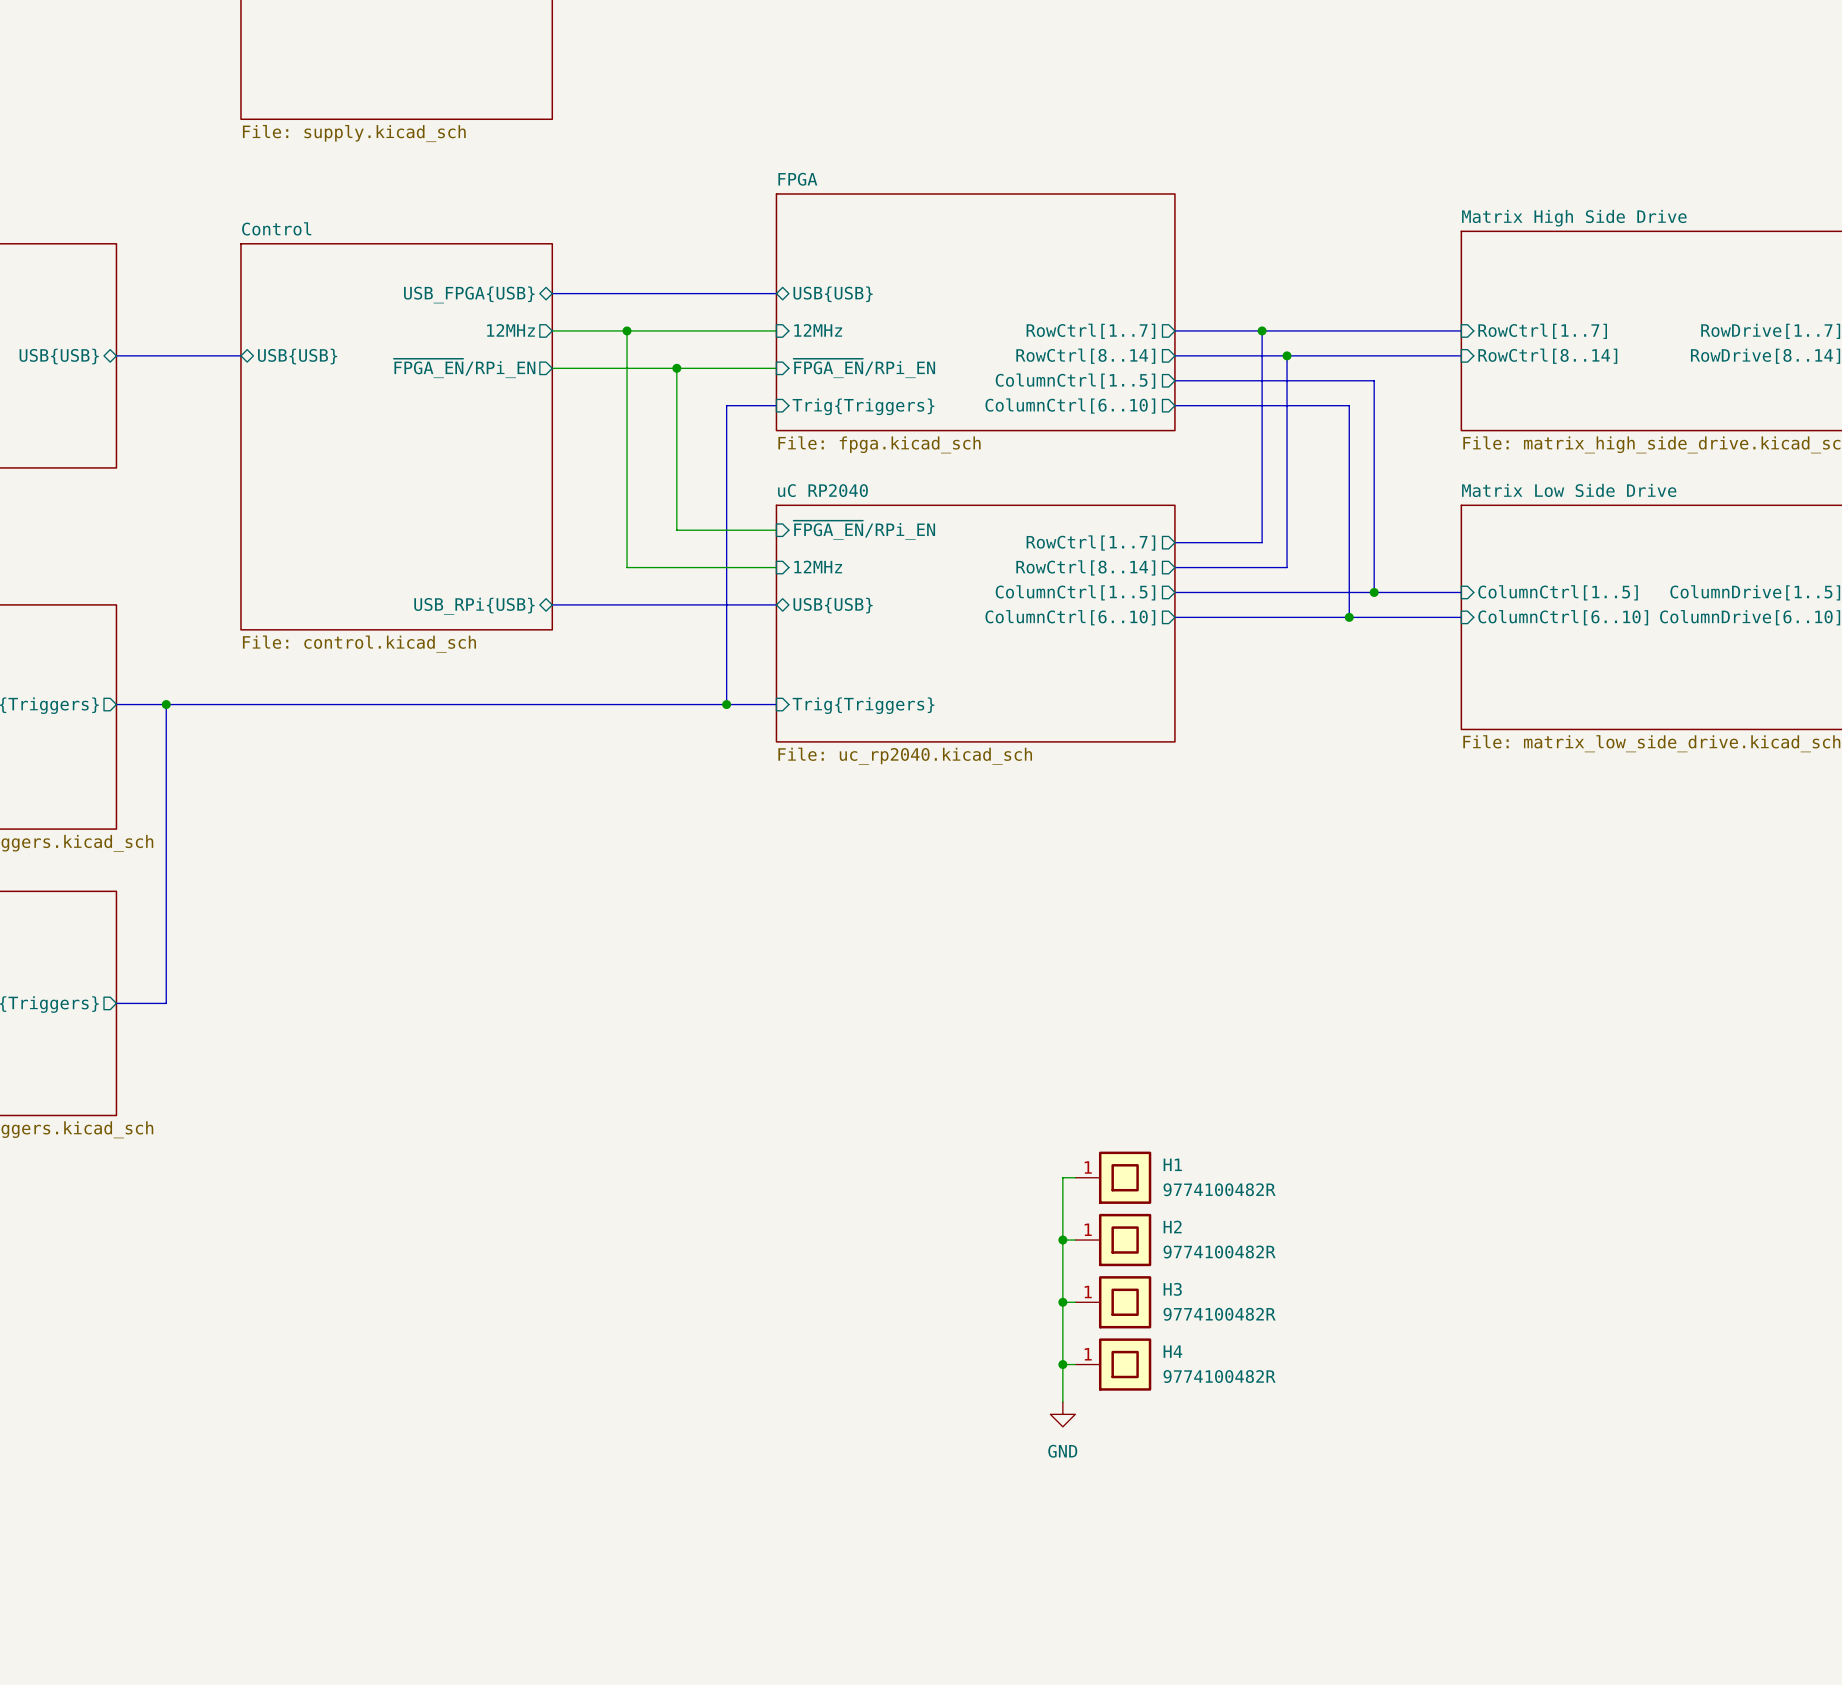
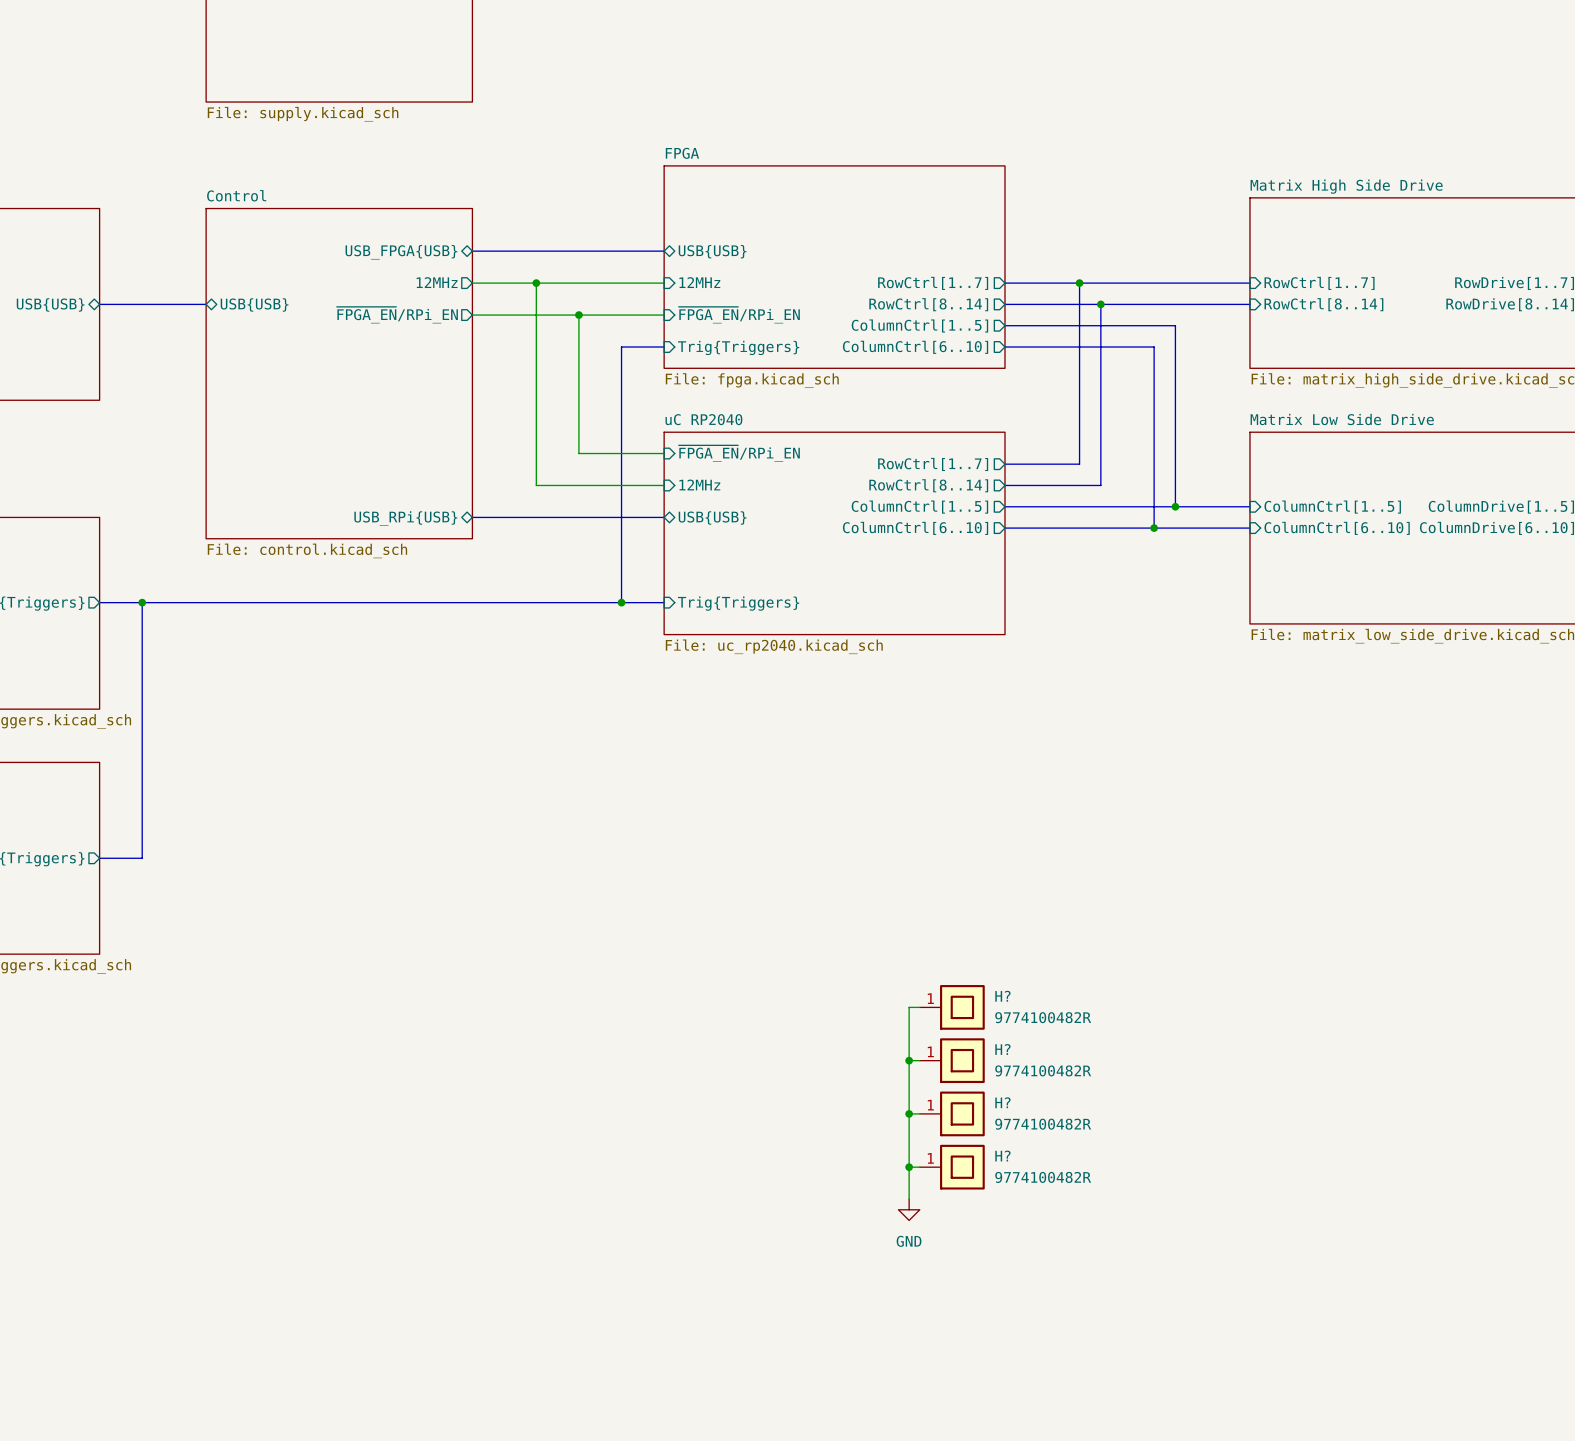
H1 name: H1 (1172, 1164) -> H? (1002, 996)
H2 name: H2 (1172, 1226) -> H? (1002, 1049)
H3 name: H3 (1172, 1289) -> H? (1002, 1102)
H4 name: H4 (1172, 1351) -> H? (1002, 1156)

